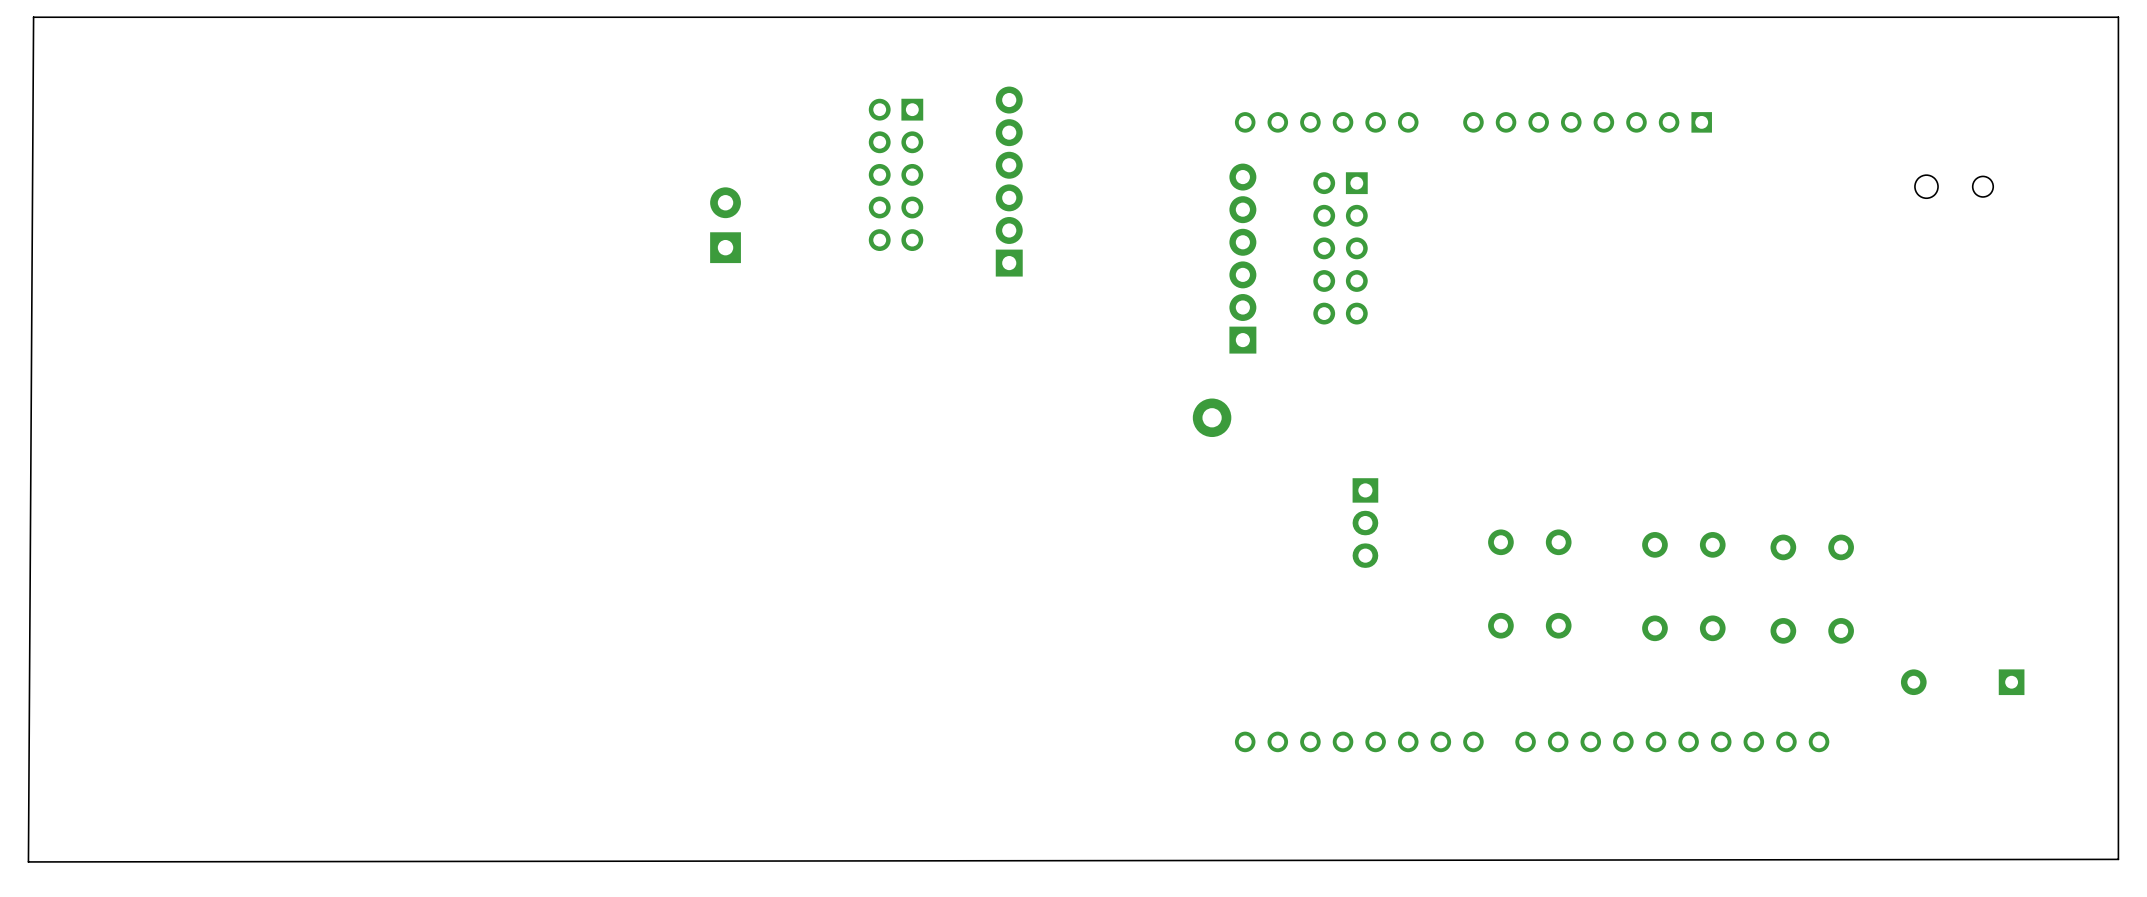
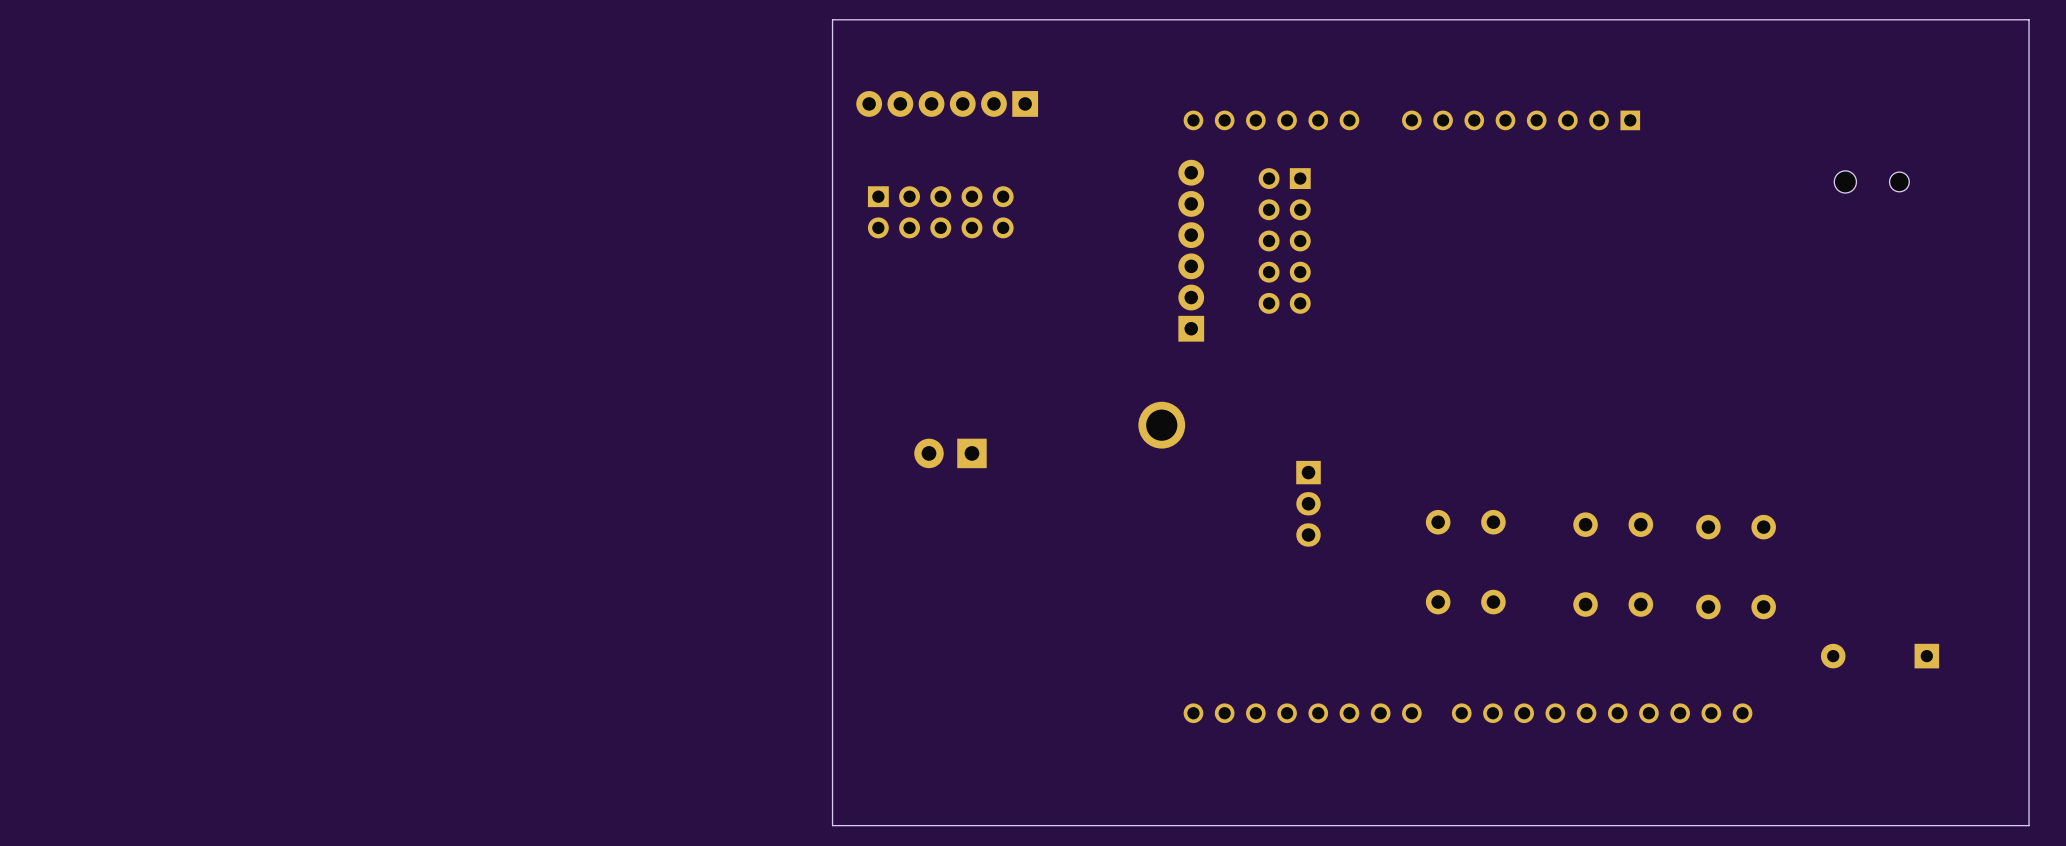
board edge: (868, 17) (33, 17) (28, 861) (2118, 859) -> (832, 19) (832, 825) (2029, 825)
part rotation: 0° (896, 174) -> 90° counterclockwise (940, 212)
part position: (896, 174) -> (940, 212)
part rotation: 0° (1009, 181) -> 90° counterclockwise (947, 103)
part: (725, 225) -> none
part: (1212, 417) -> none
part: none -> (1161, 425)
part: none -> (950, 453)

